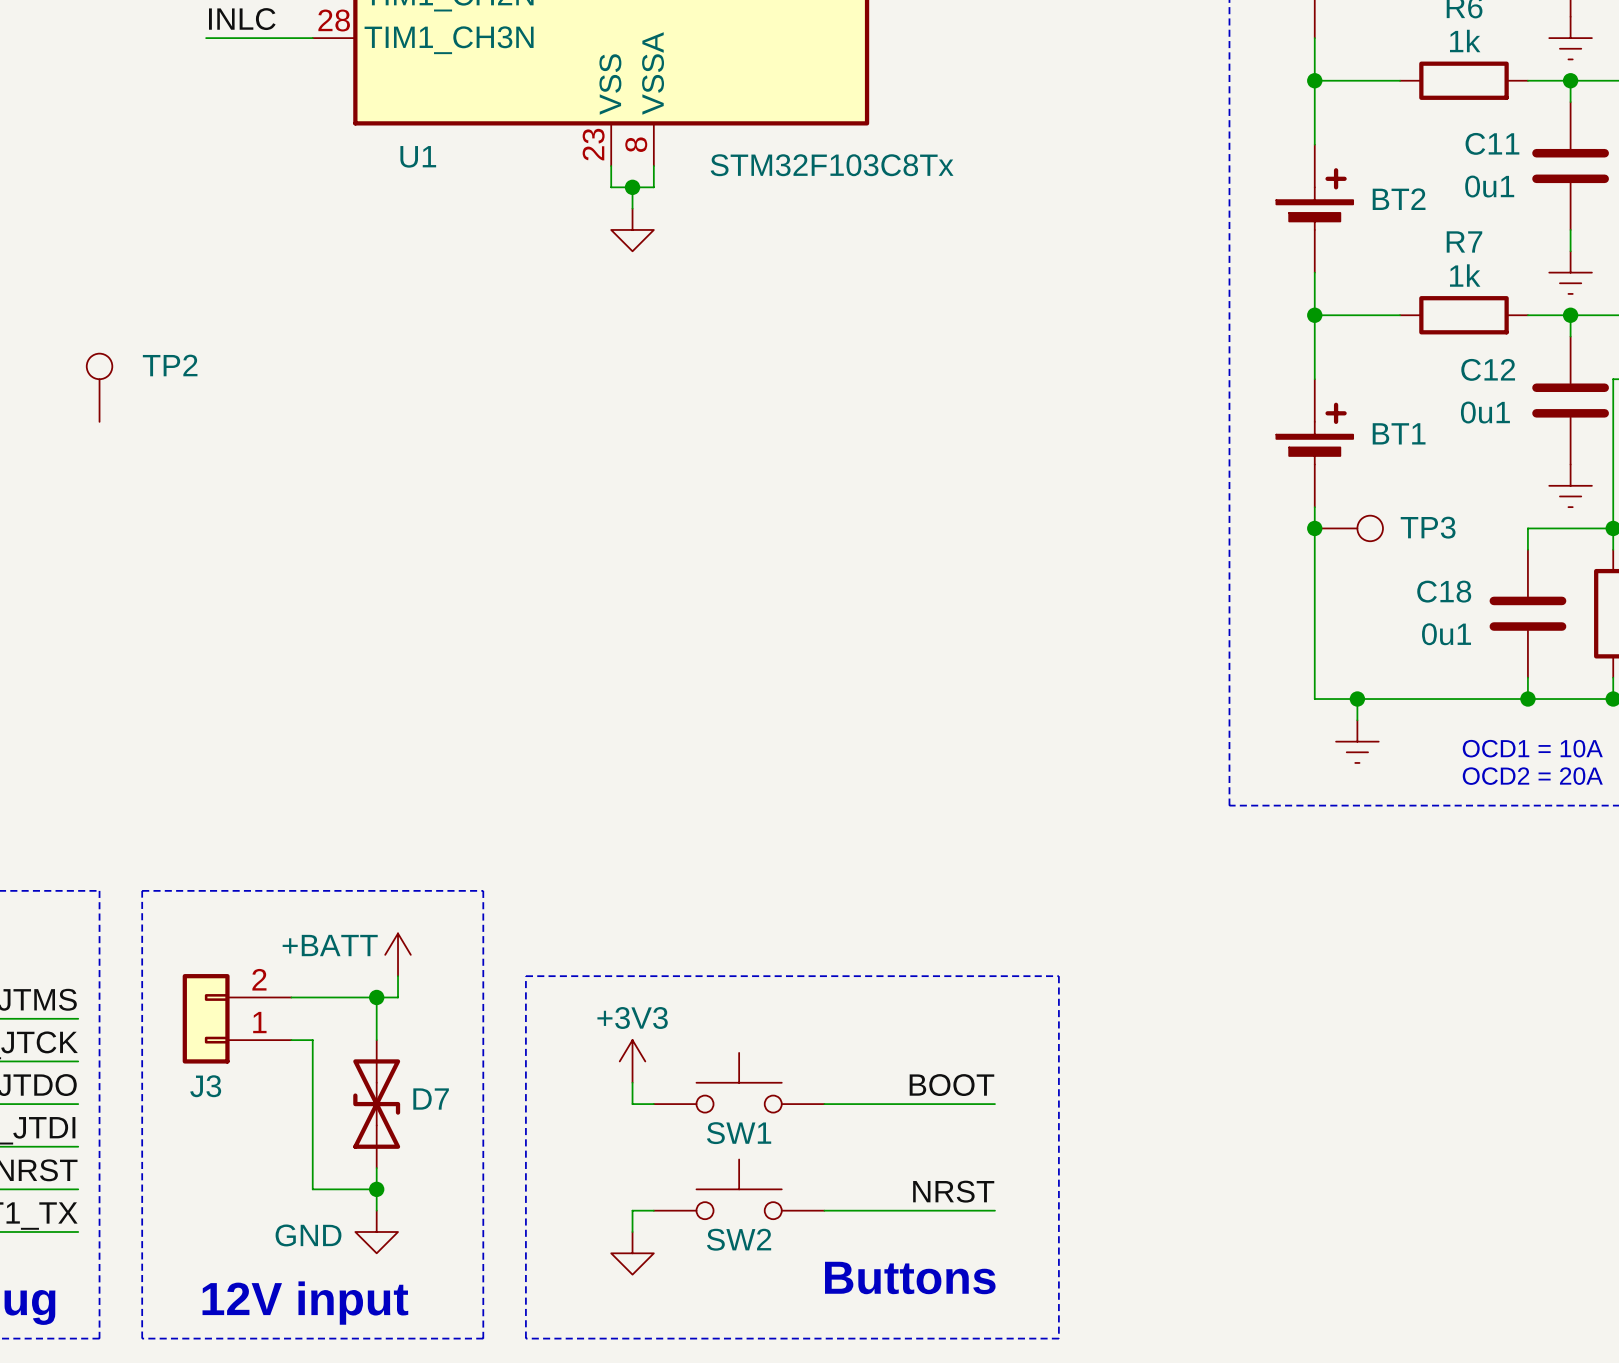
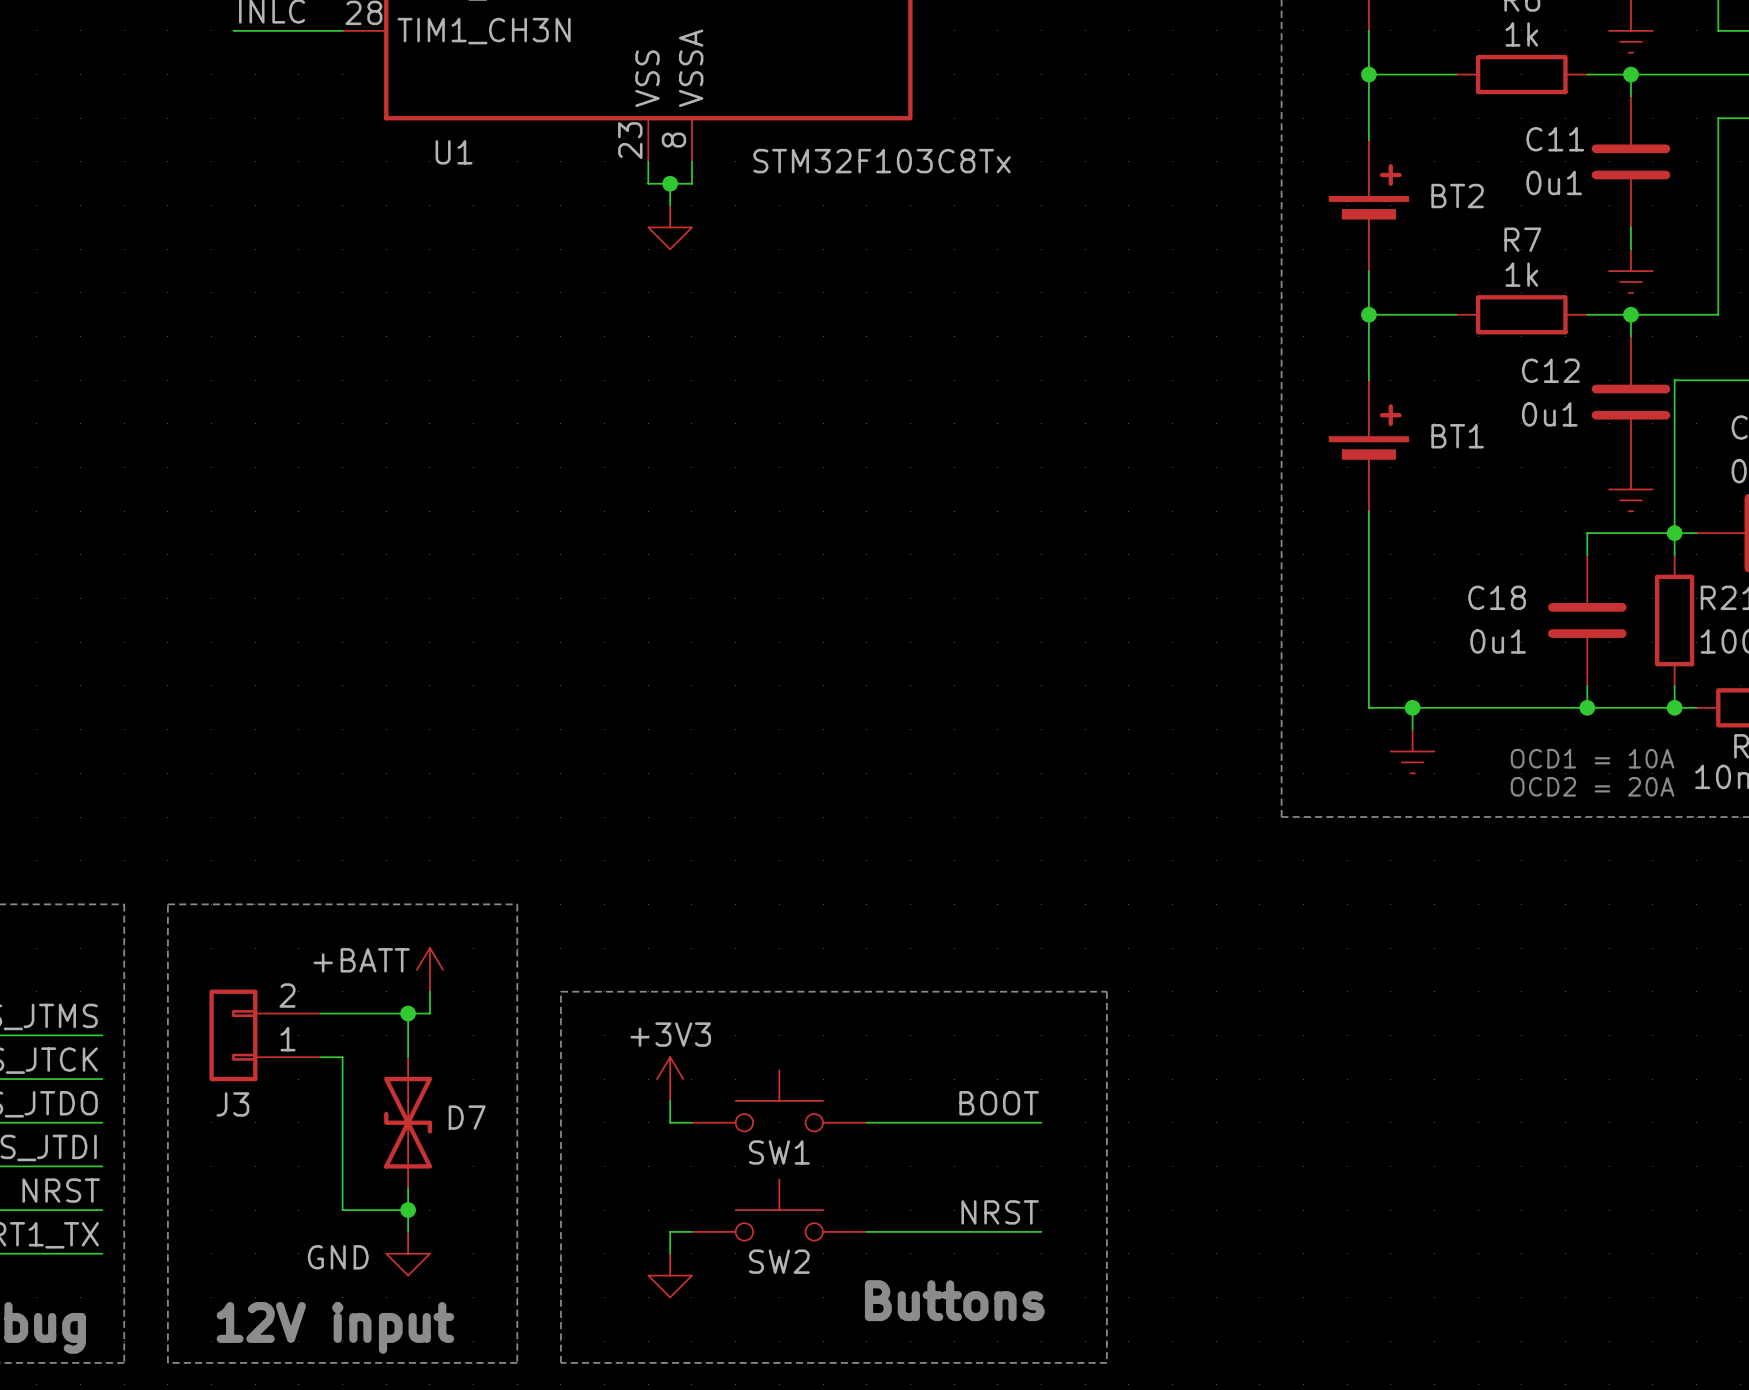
TP2: (99, 387) -> none
junction: (1314, 528) -> none
TP3: (1348, 528) -> none

